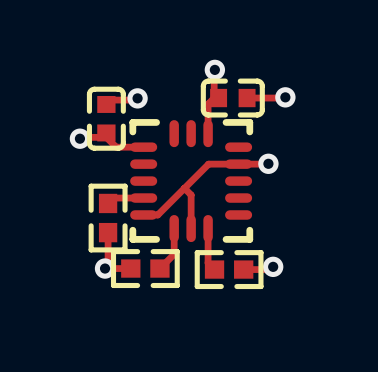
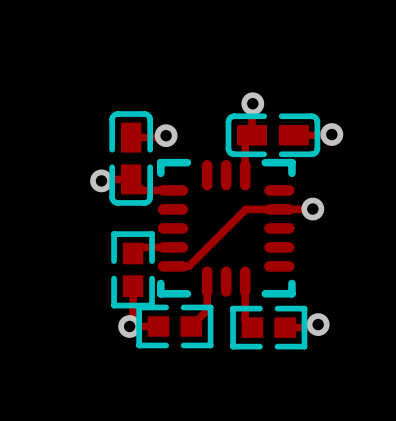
part footprint: [200, 78, 265, 118] -> [225, 113, 321, 158]
part footprint: [86, 86, 126, 151] -> [109, 111, 154, 206]
top track: (184, 188) (191, 194) (191, 228) -> none

